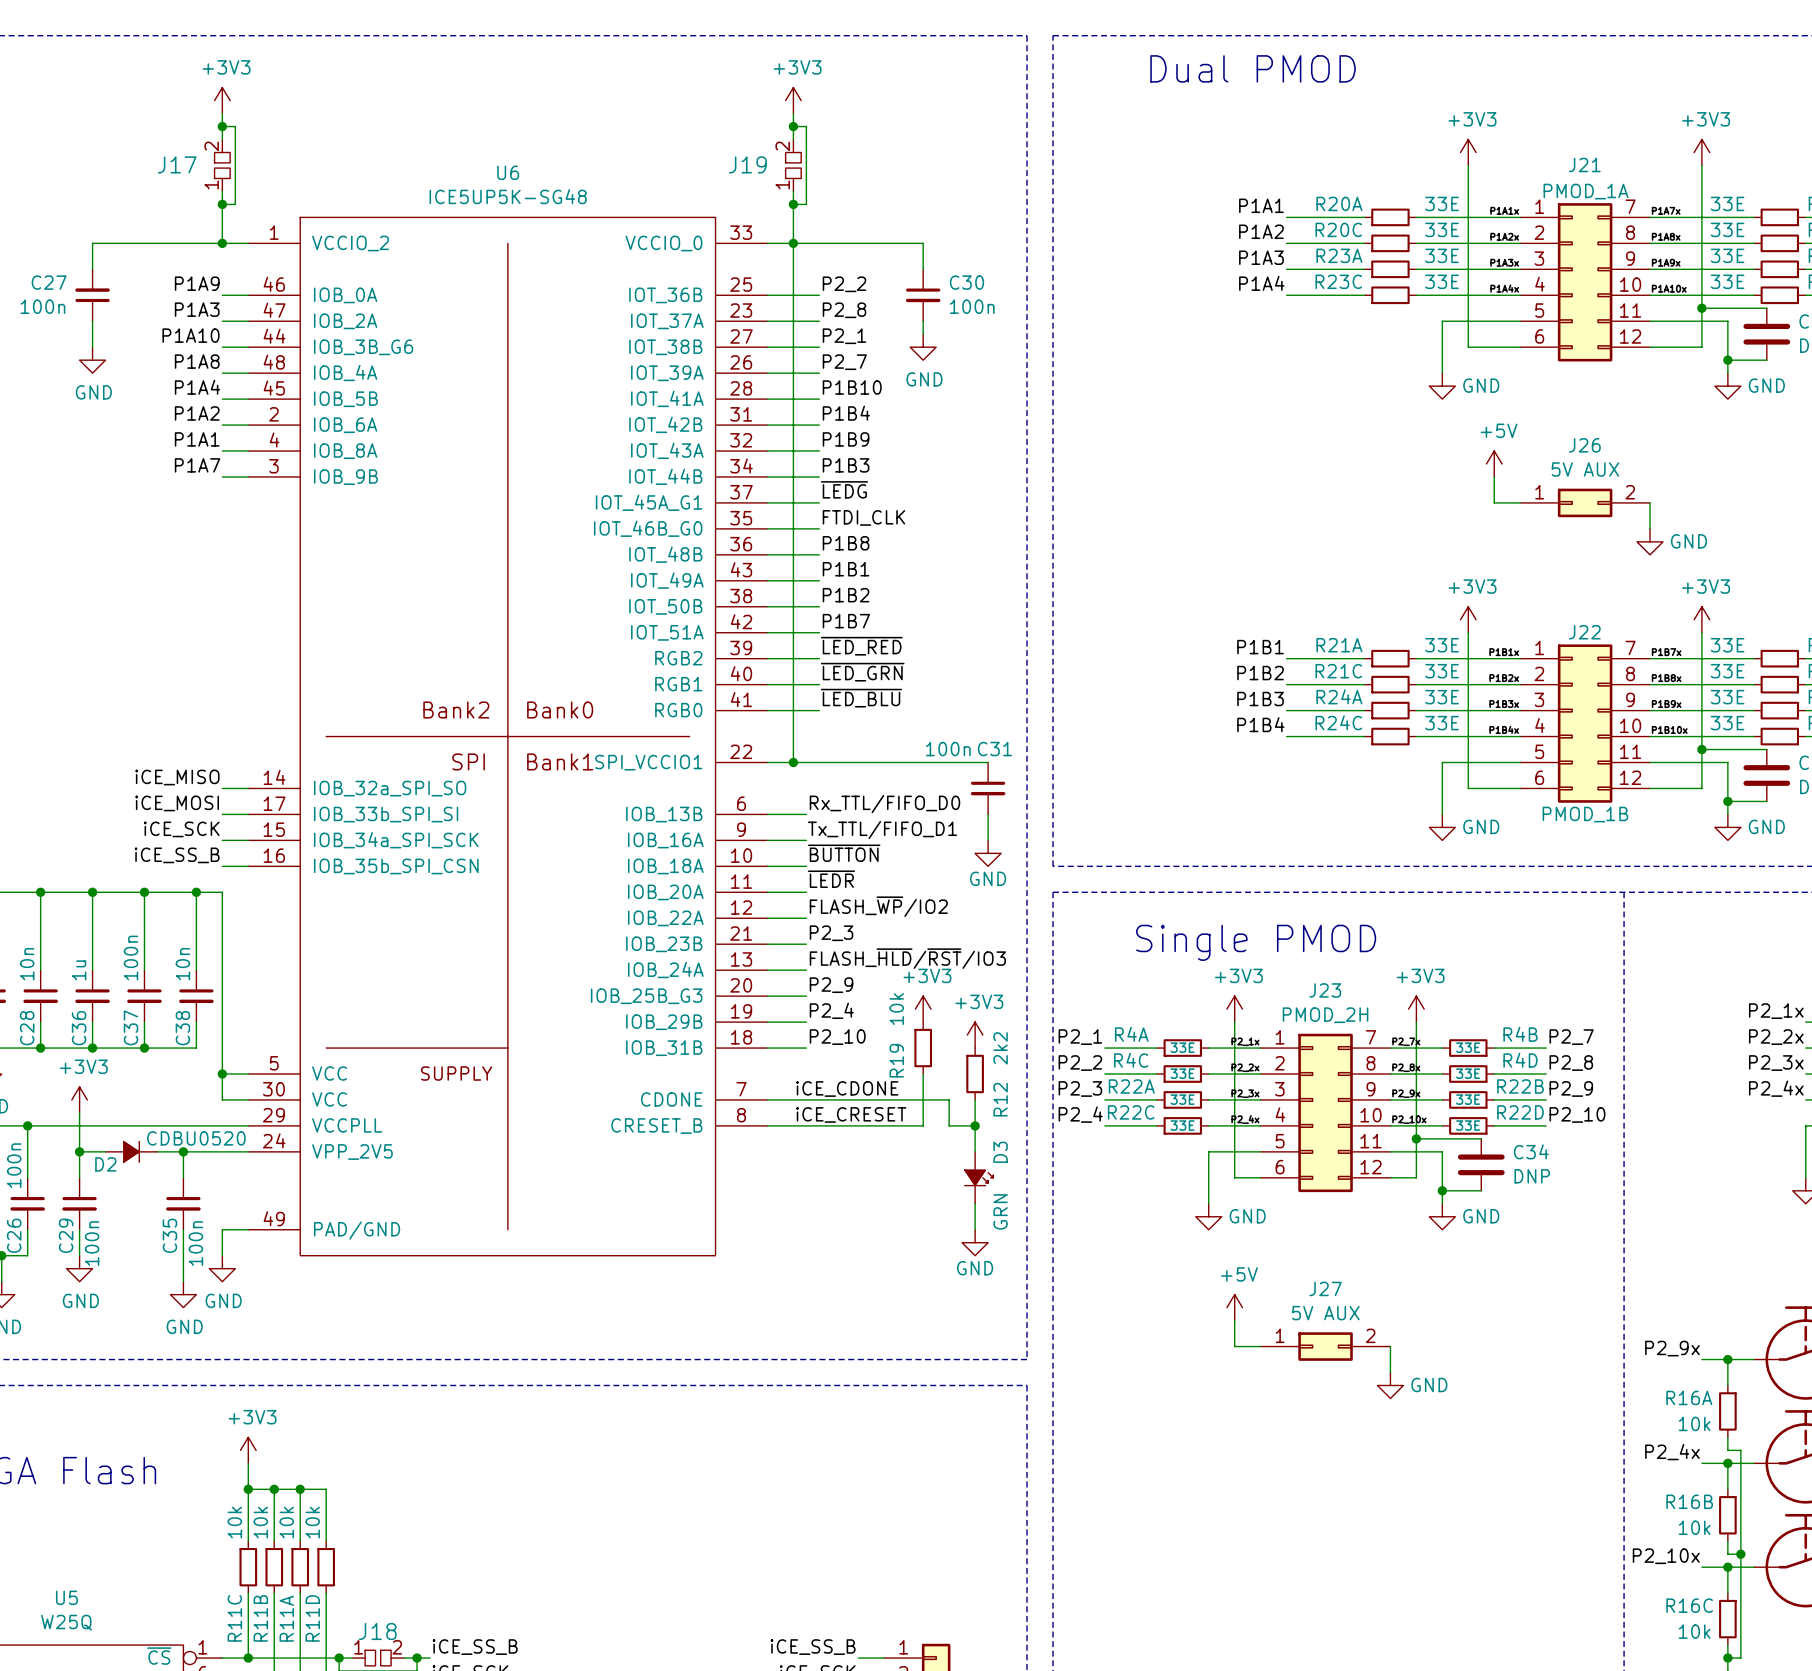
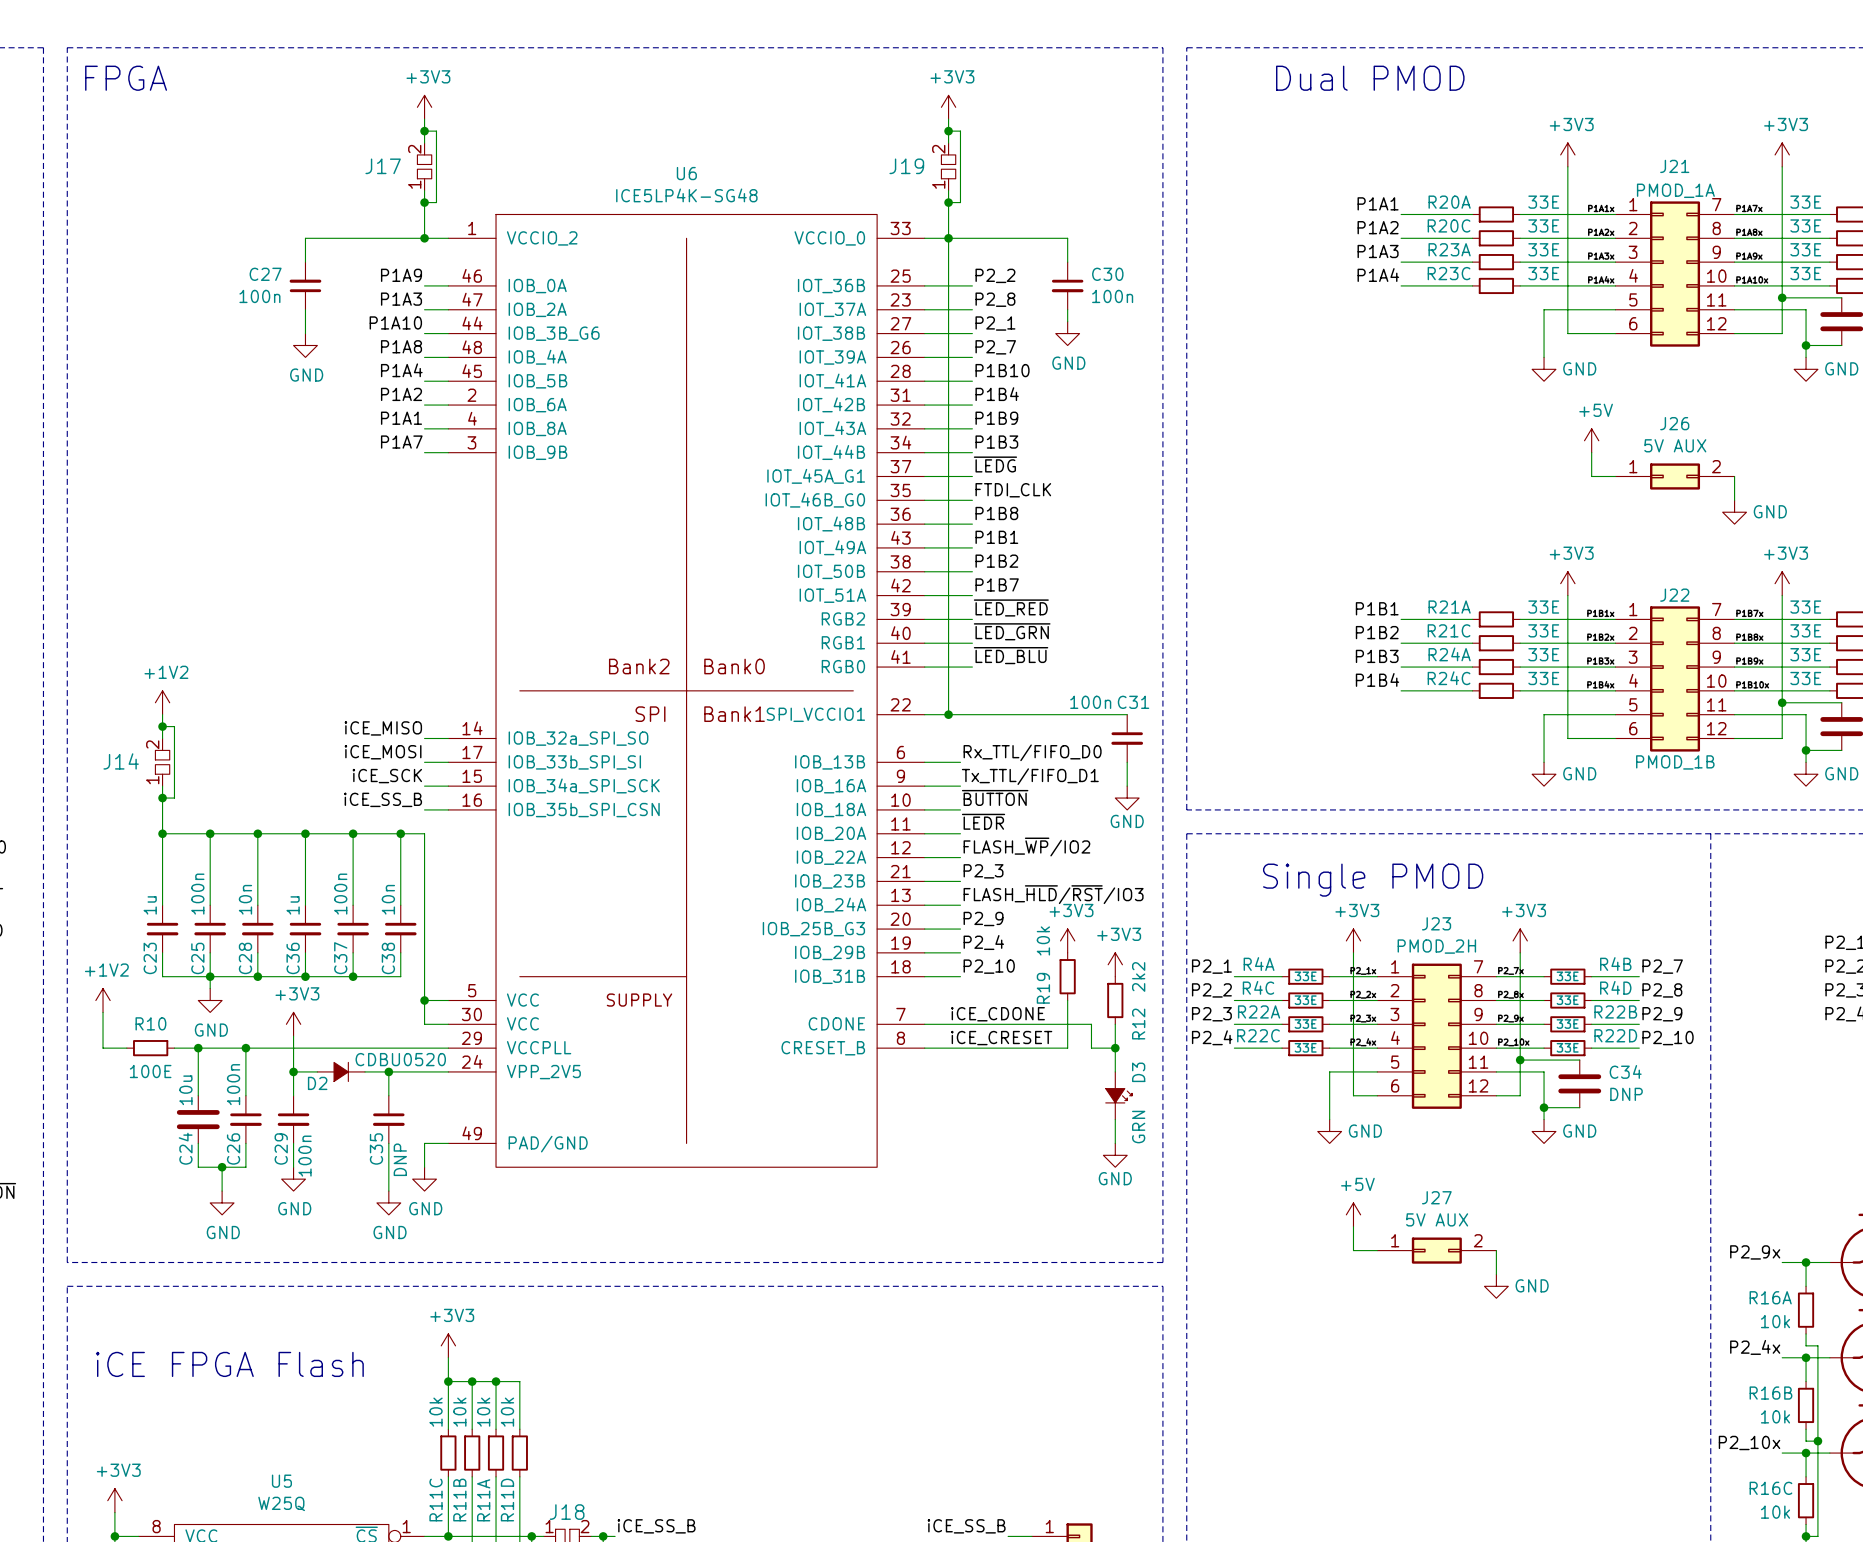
U6 value: ICE5UP5K-SG48 (508, 196) -> ICE5LP4K-SG48 (686, 195)
C35 value: 100n (195, 1243) -> DNP (400, 1159)

